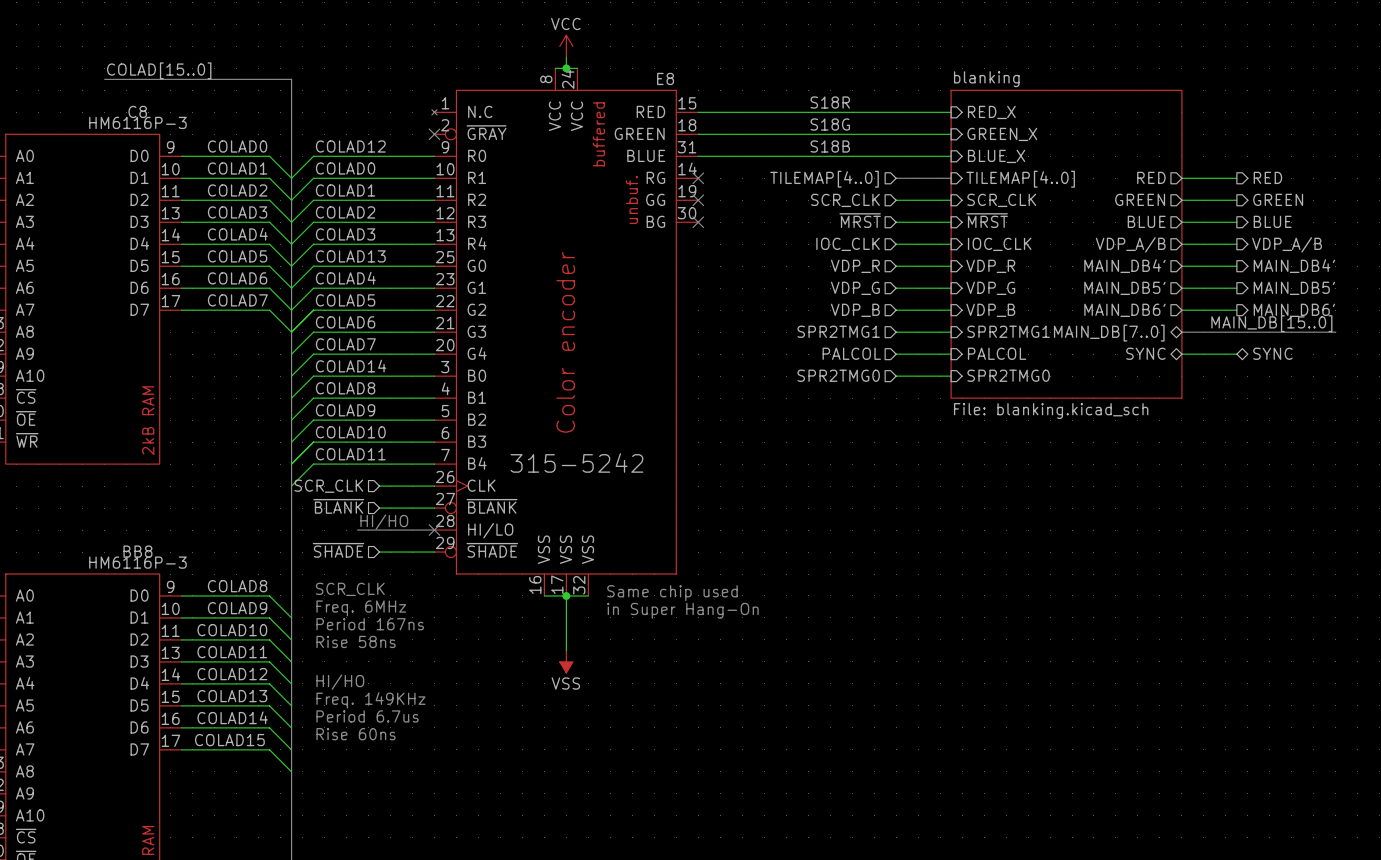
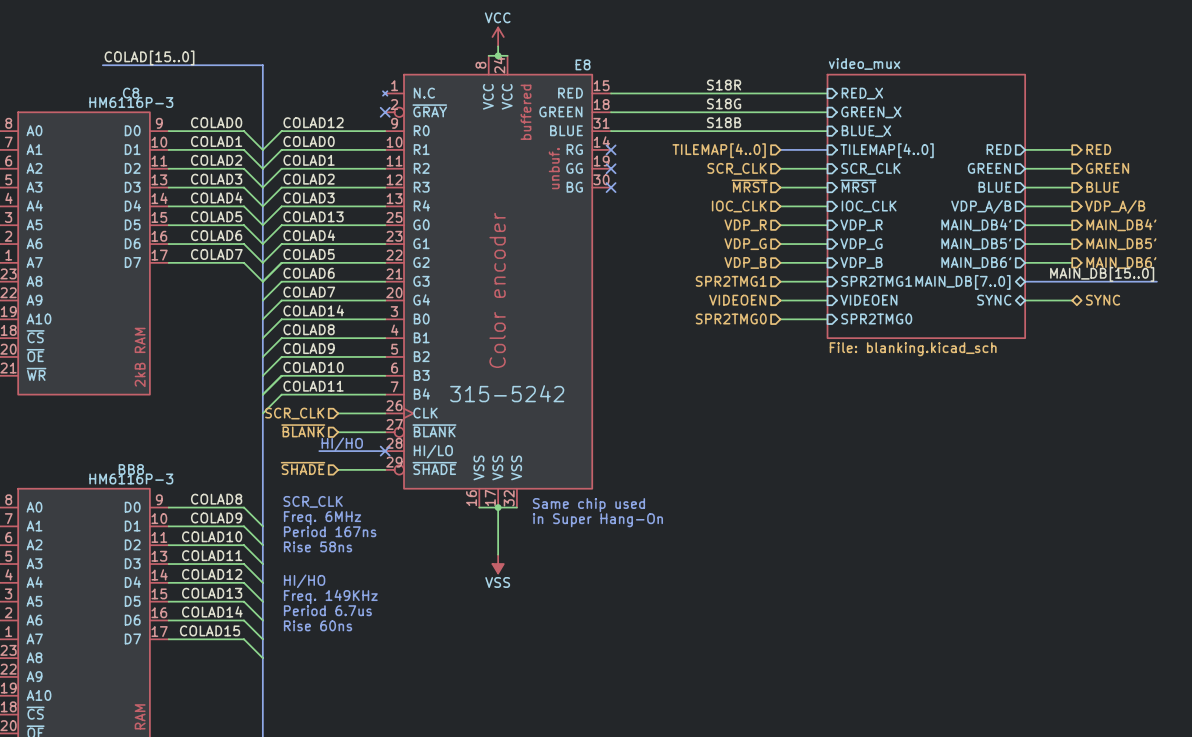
sheet blanking name: blanking (986, 79) -> video_mux (864, 63)
hierarchical label: PALCOL (851, 353) -> VIDEOEN (737, 300)
sheet pin: PALCOL (997, 353) -> VIDEOEN (868, 300)

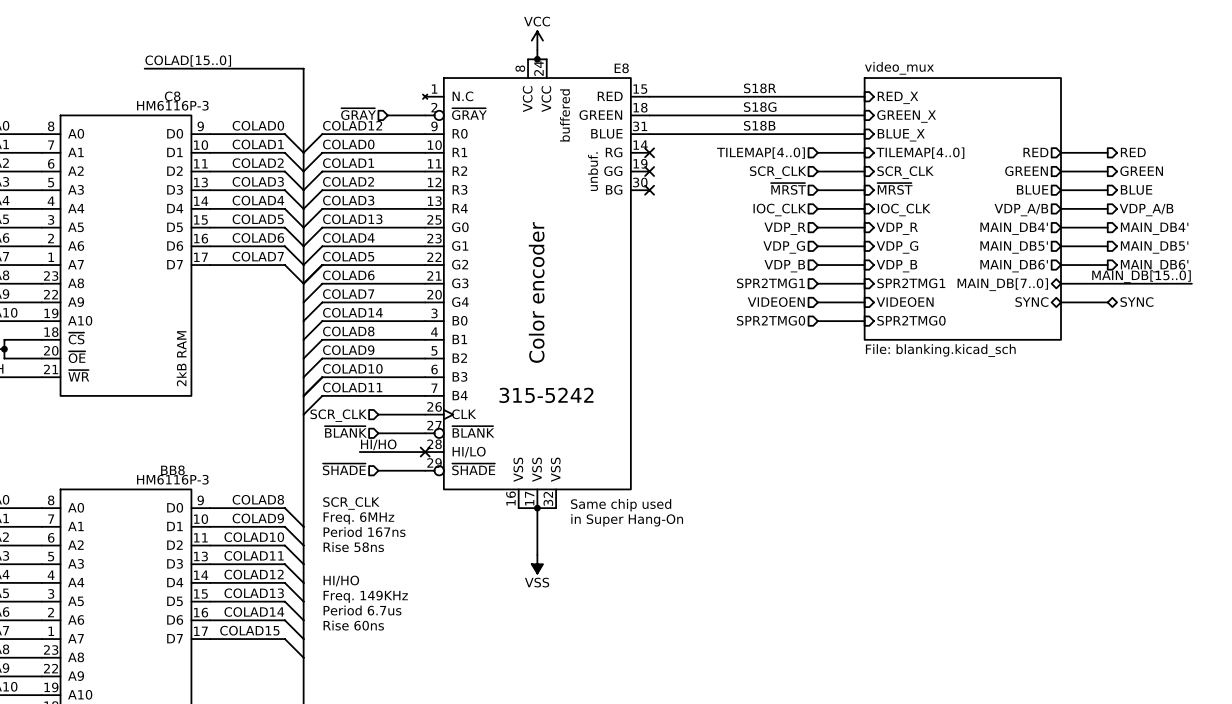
hierarchical label: none -> ~{GRAY} (358, 114)
wire: none -> (387, 115) (425, 115)
no-connect mark: (385, 112) -> none

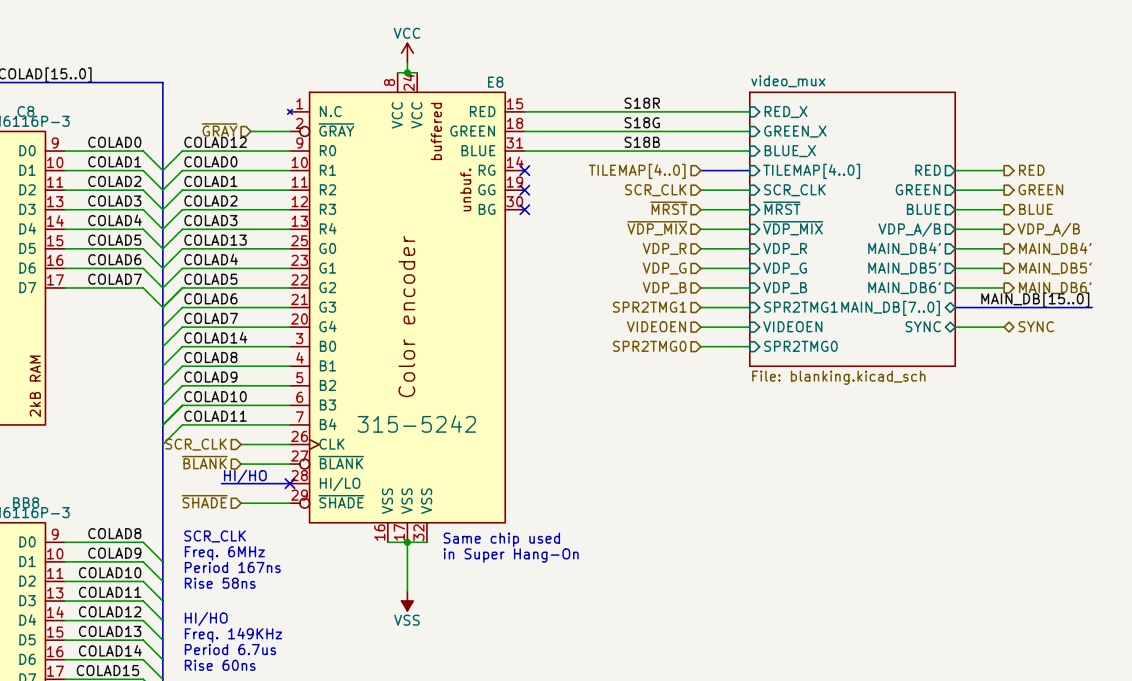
hierarchical label: IOC_CLK (779, 210) -> ~{VDP_MIX} (657, 228)
sheet pin: IOC_CLK (904, 210) -> ~{VDP_MIX} (793, 228)

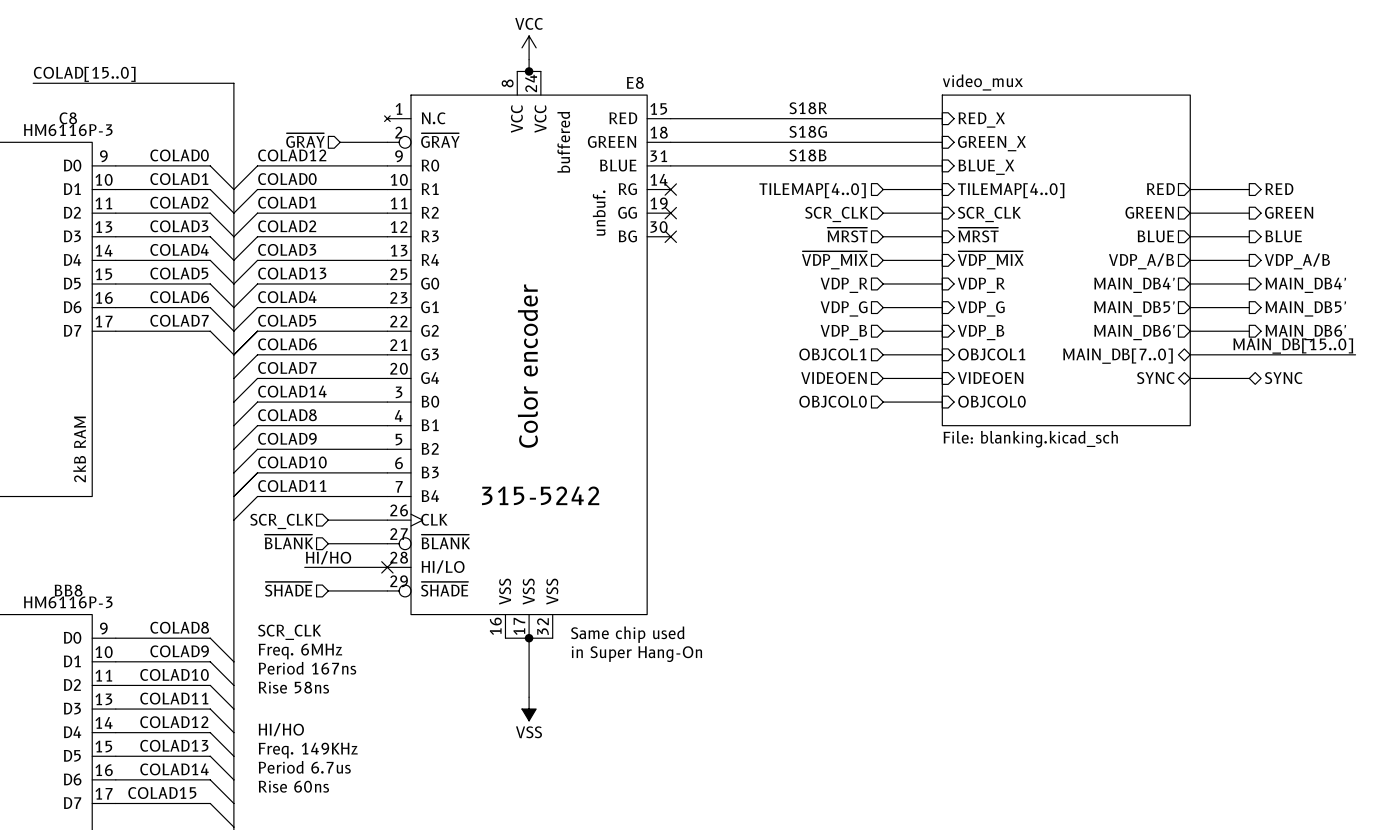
hierarchical label: SPR2TMG1 (649, 307) -> OBJCOL1 (832, 354)
sheet pin: SPR2TMG1 (800, 307) -> OBJCOL1 (991, 354)
hierarchical label: SPR2TMG0 (649, 346) -> OBJCOL0 (833, 401)
sheet pin: SPR2TMG0 (800, 346) -> OBJCOL0 (992, 401)

